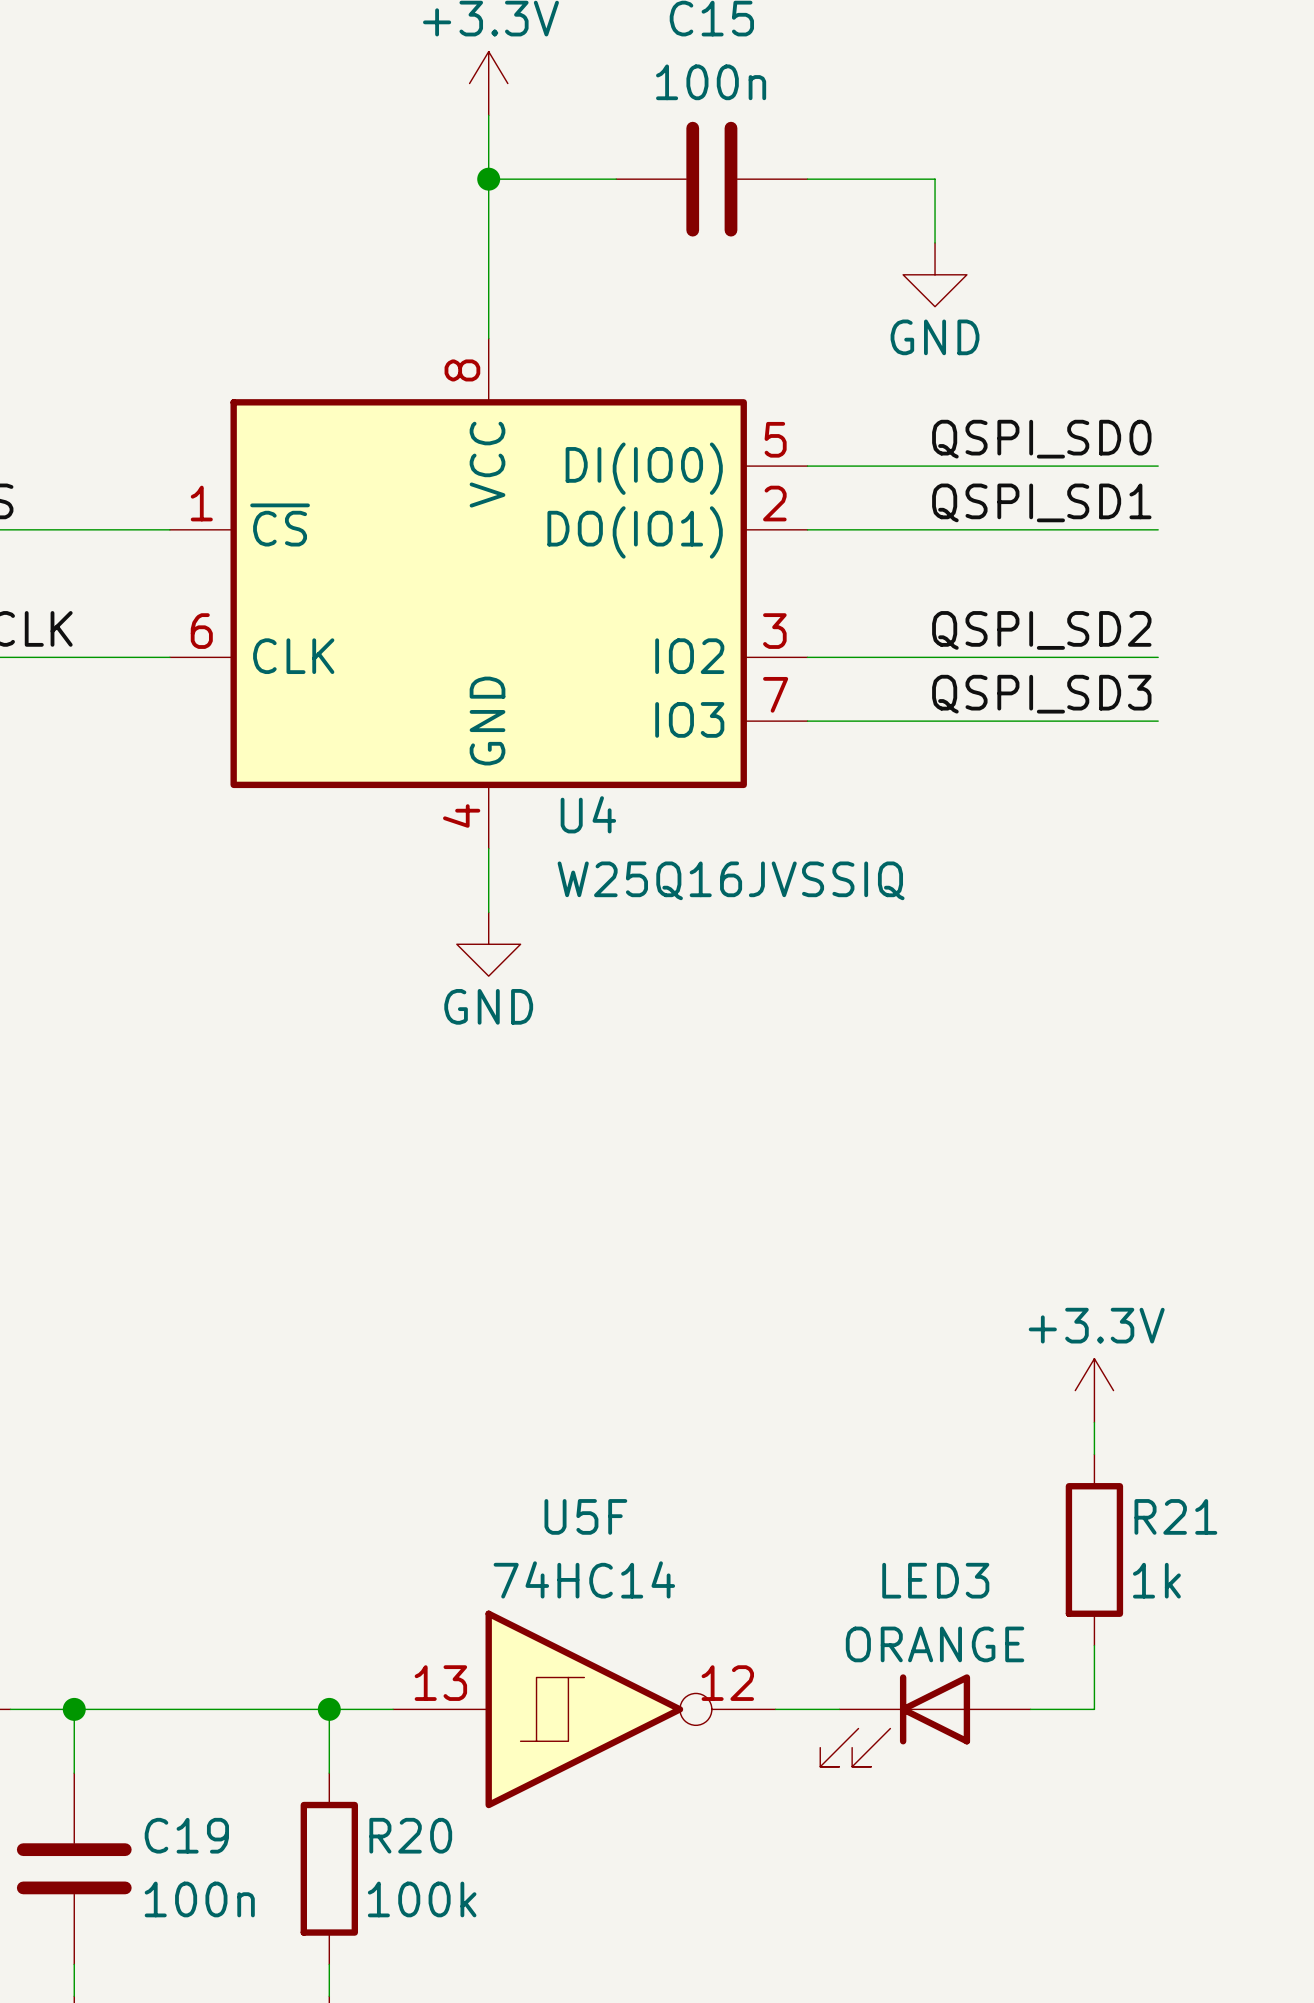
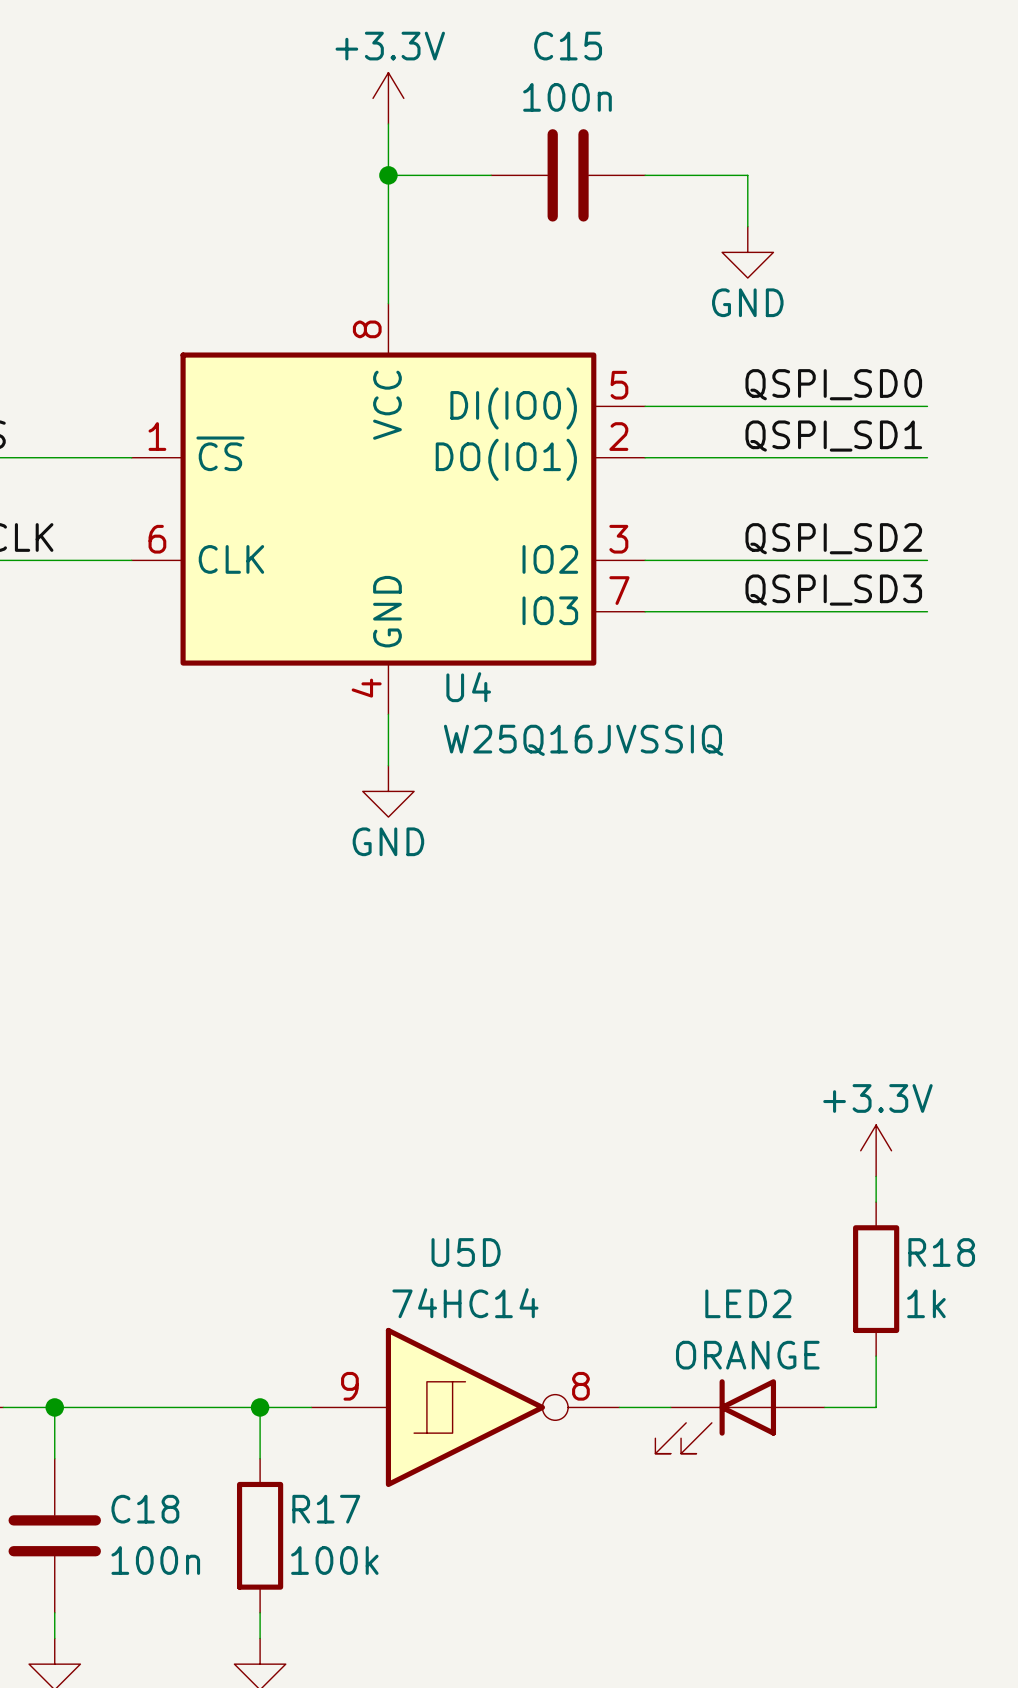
U5F name: U5F (585, 1516) -> U5D (466, 1252)
R21 name: R21 (1175, 1516) -> R18 (941, 1252)
LED3 name: LED3 (935, 1580) -> LED2 (748, 1303)
U5F pin number: 13 (440, 1683) -> 9 (349, 1386)
U5F pin number: 12 (727, 1683) -> 8 (580, 1386)
C19 name: C19 (186, 1835) -> C18 (145, 1509)
R20 name: R20 (410, 1835) -> R17 (326, 1509)

